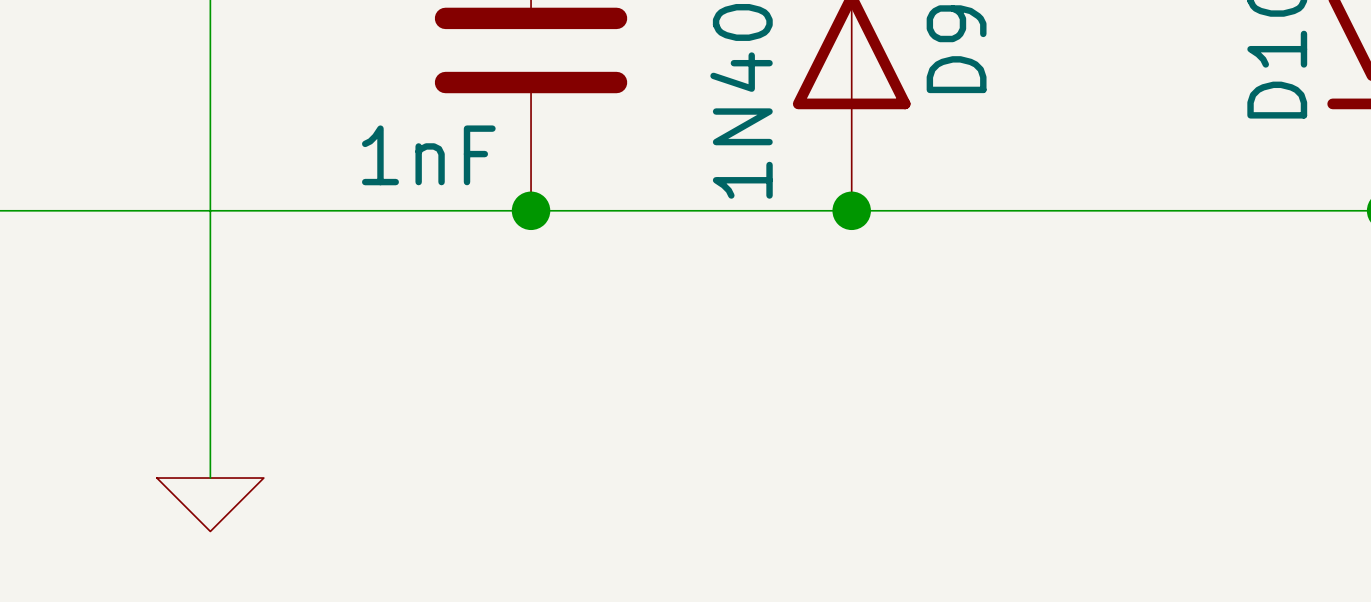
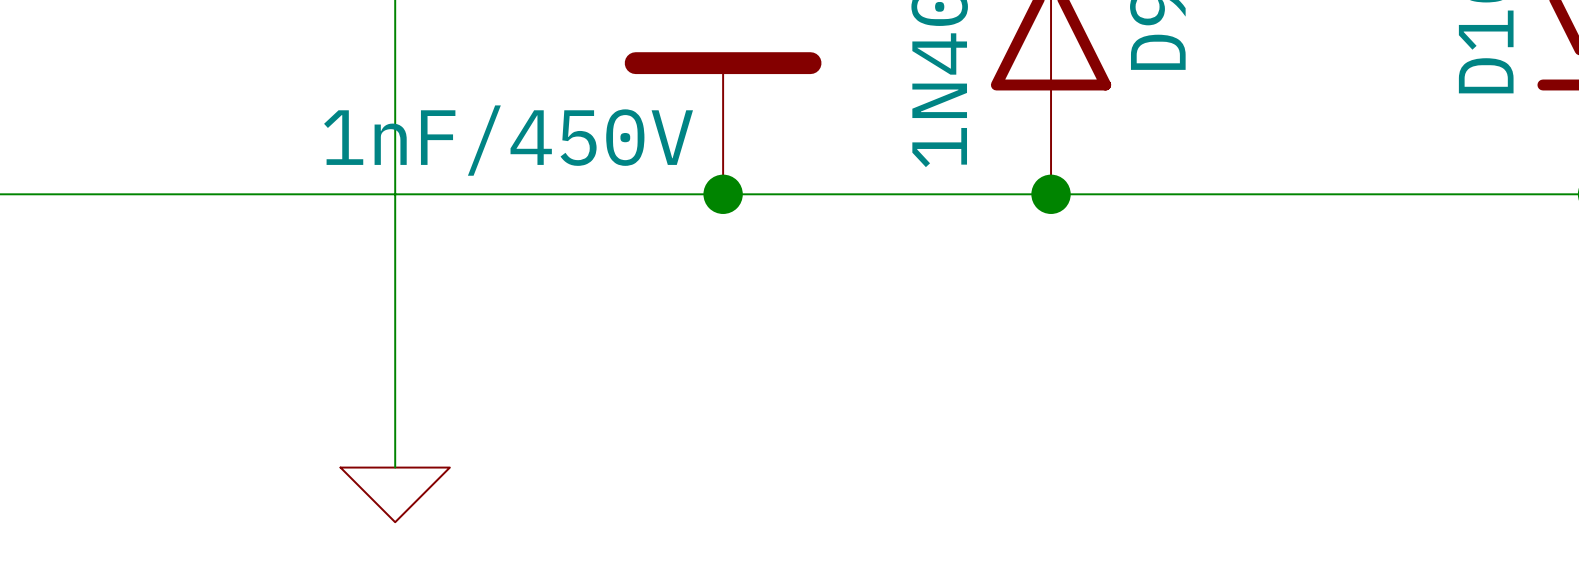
part value: 1nF (428, 155) -> 1nF/450V (508, 140)

